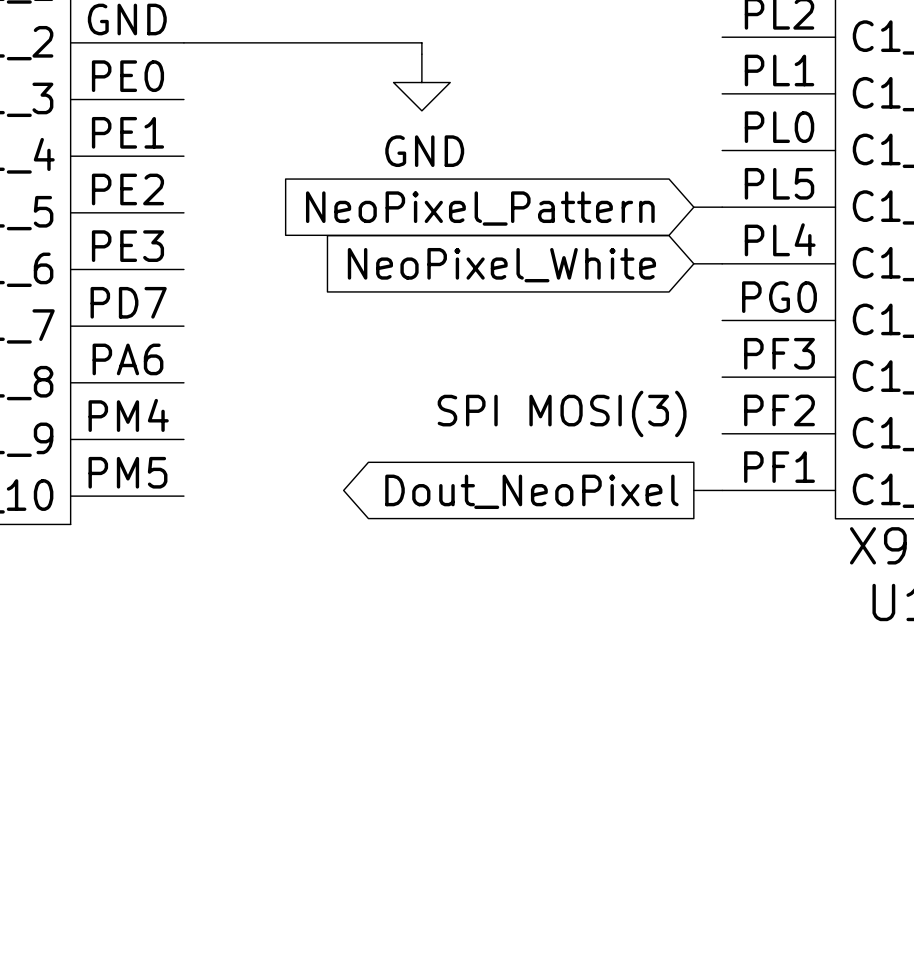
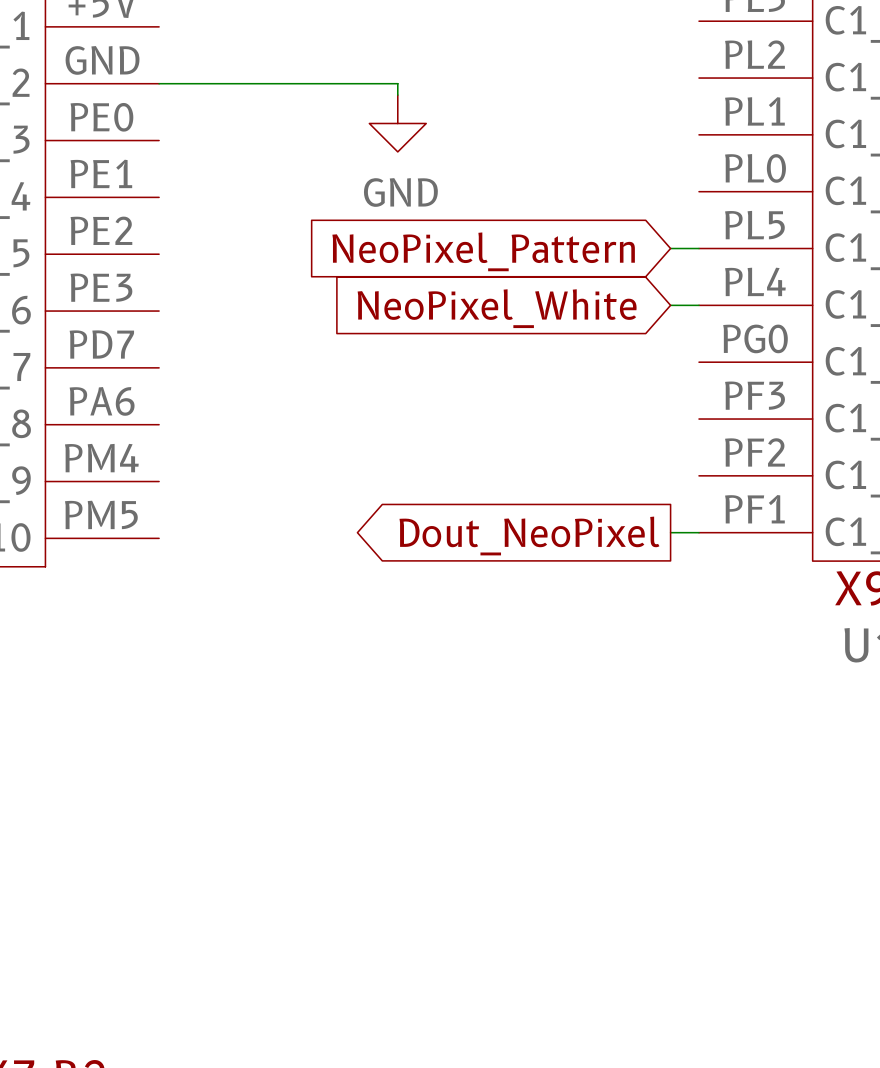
text: SPI MOSI(3) (562, 413) -> none

